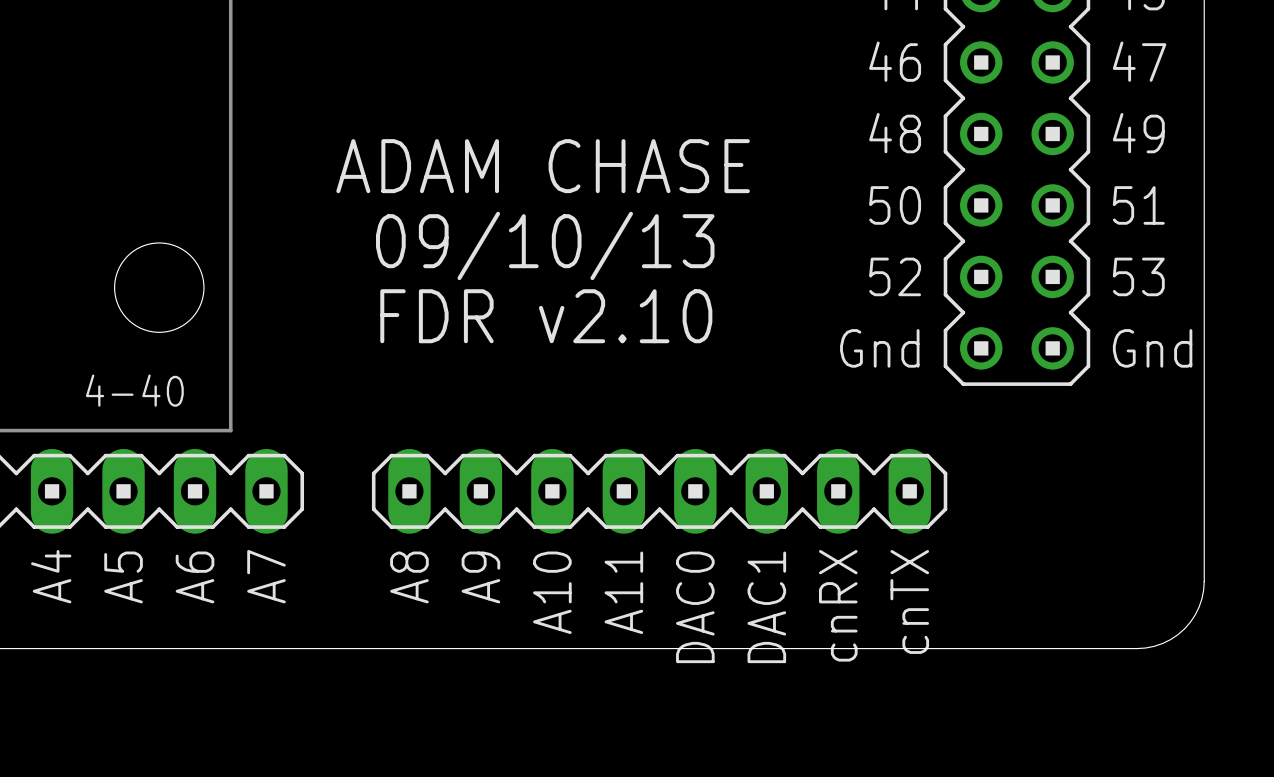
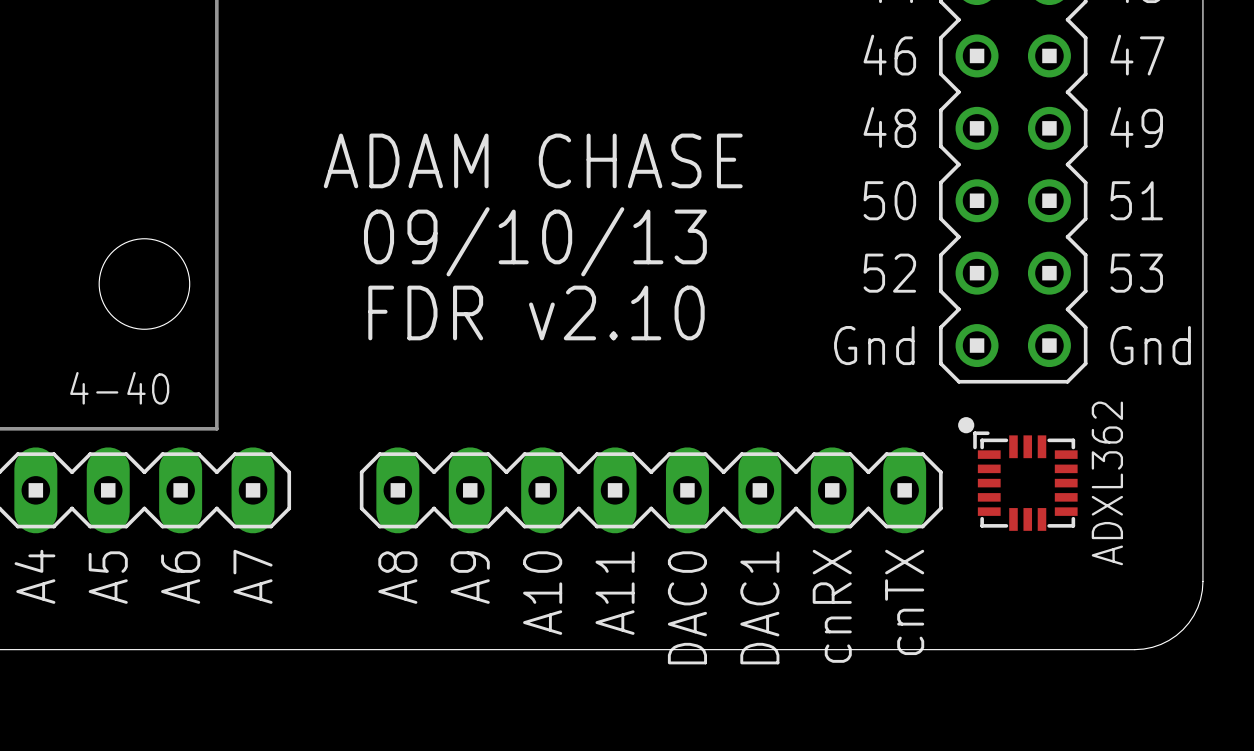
drawing: none -> [958, 417, 975, 434]
part: none -> (1025, 481)
text: none -> ADXL362 (1107, 483)

